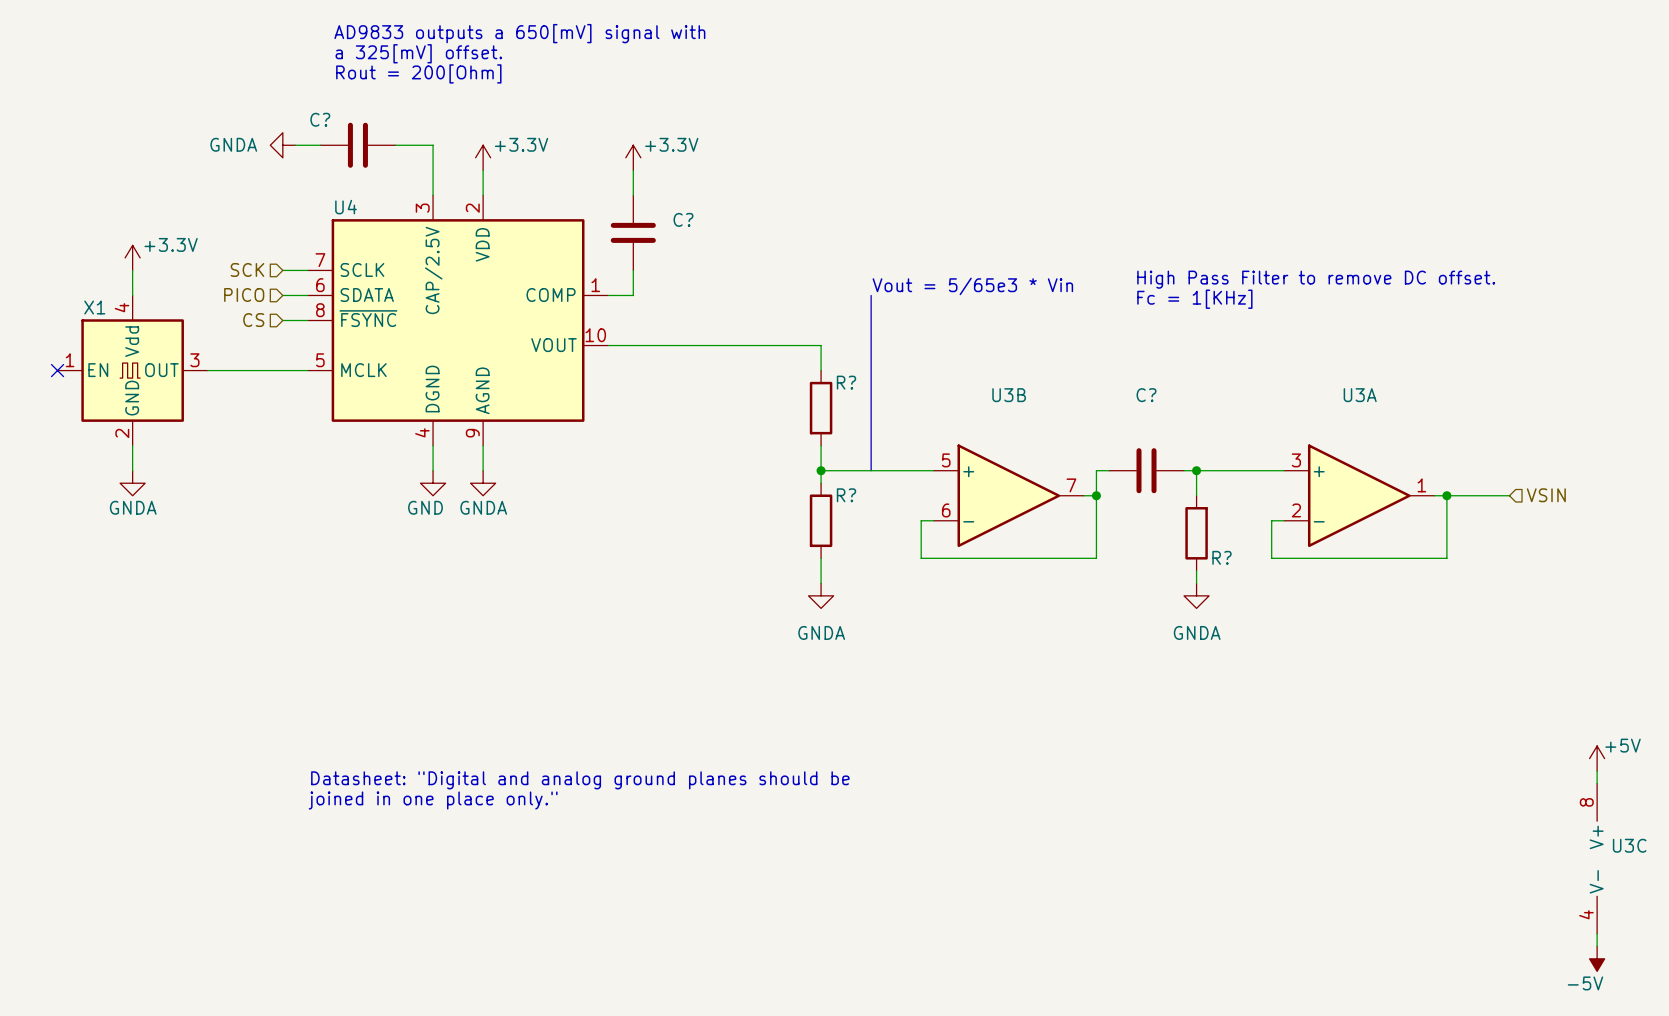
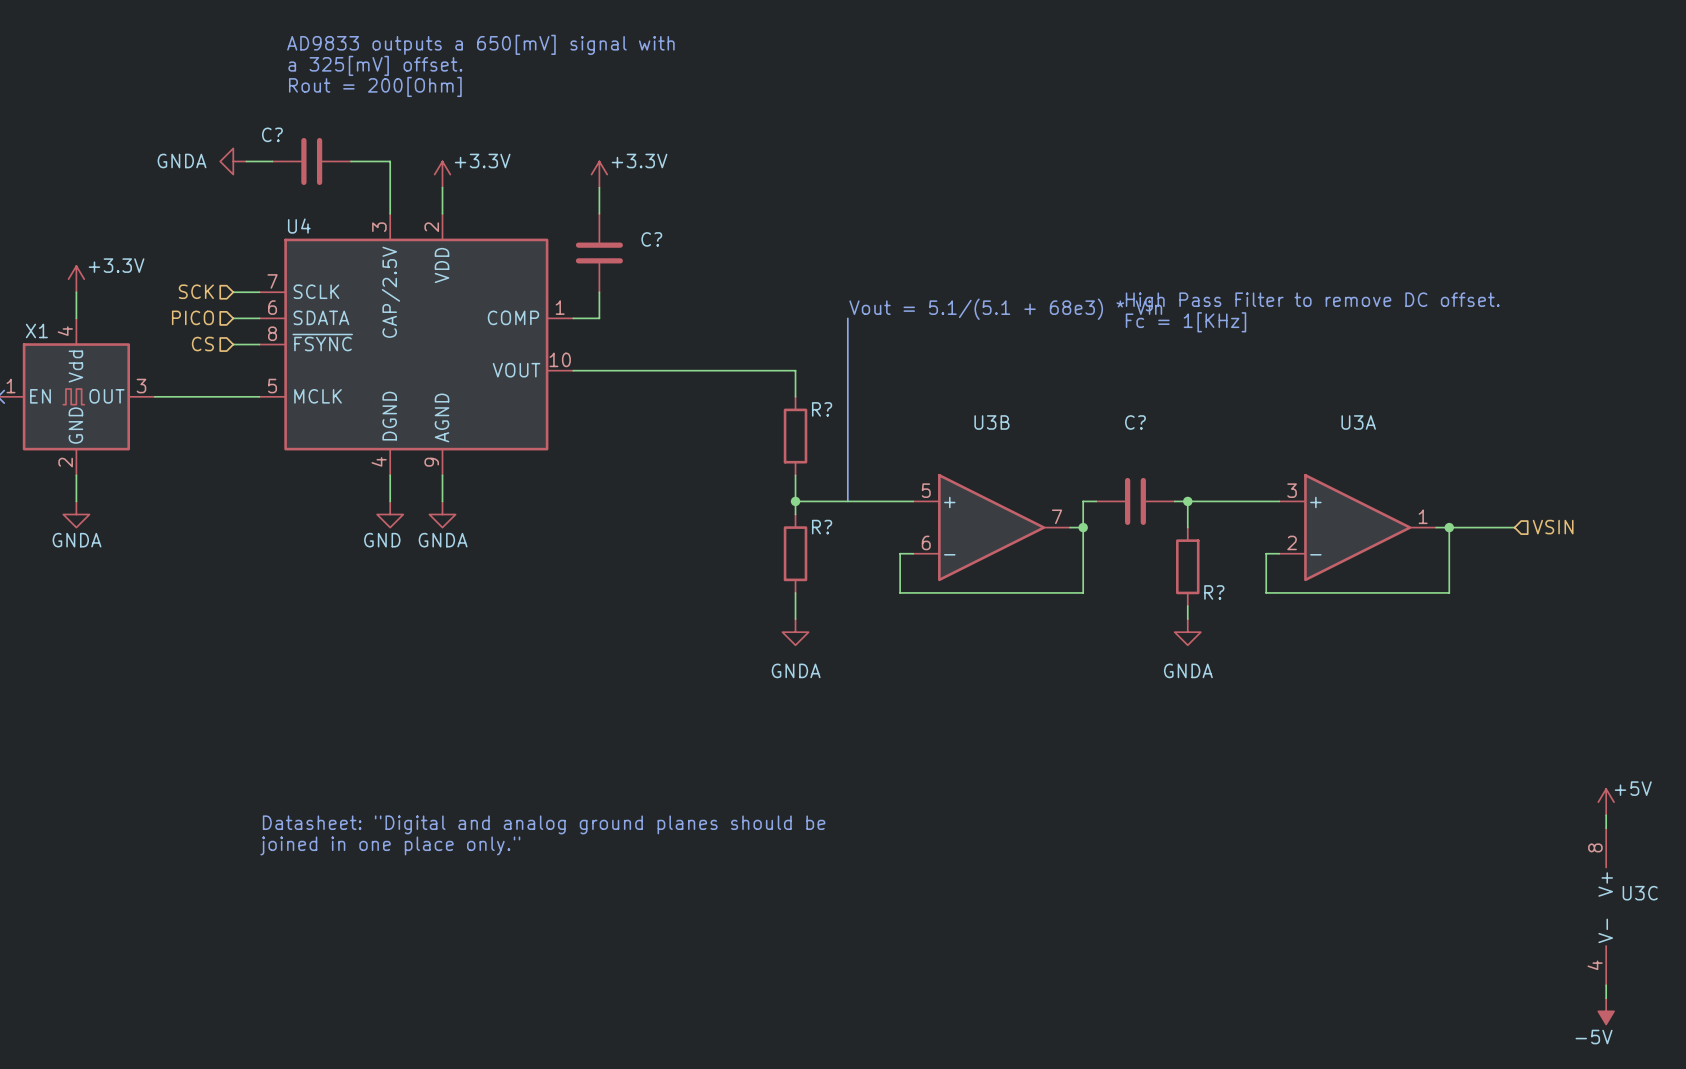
text: Vout = 5/65e3 * Vin (972, 286) -> Vout = 5.1/(5.1 + 68e3) * Vin (1005, 309)

